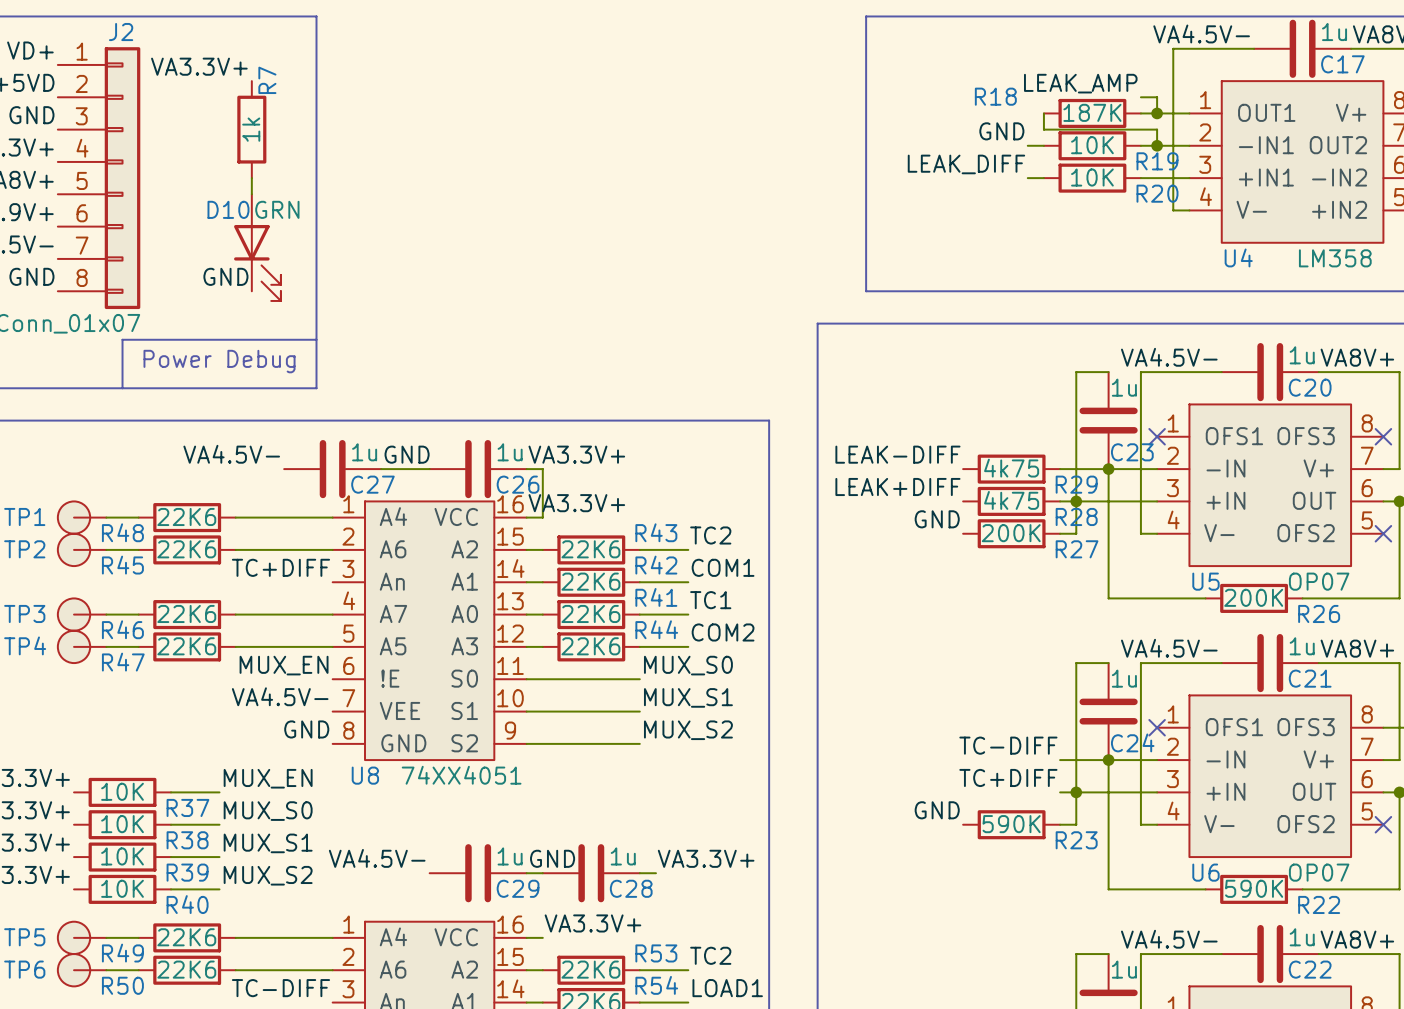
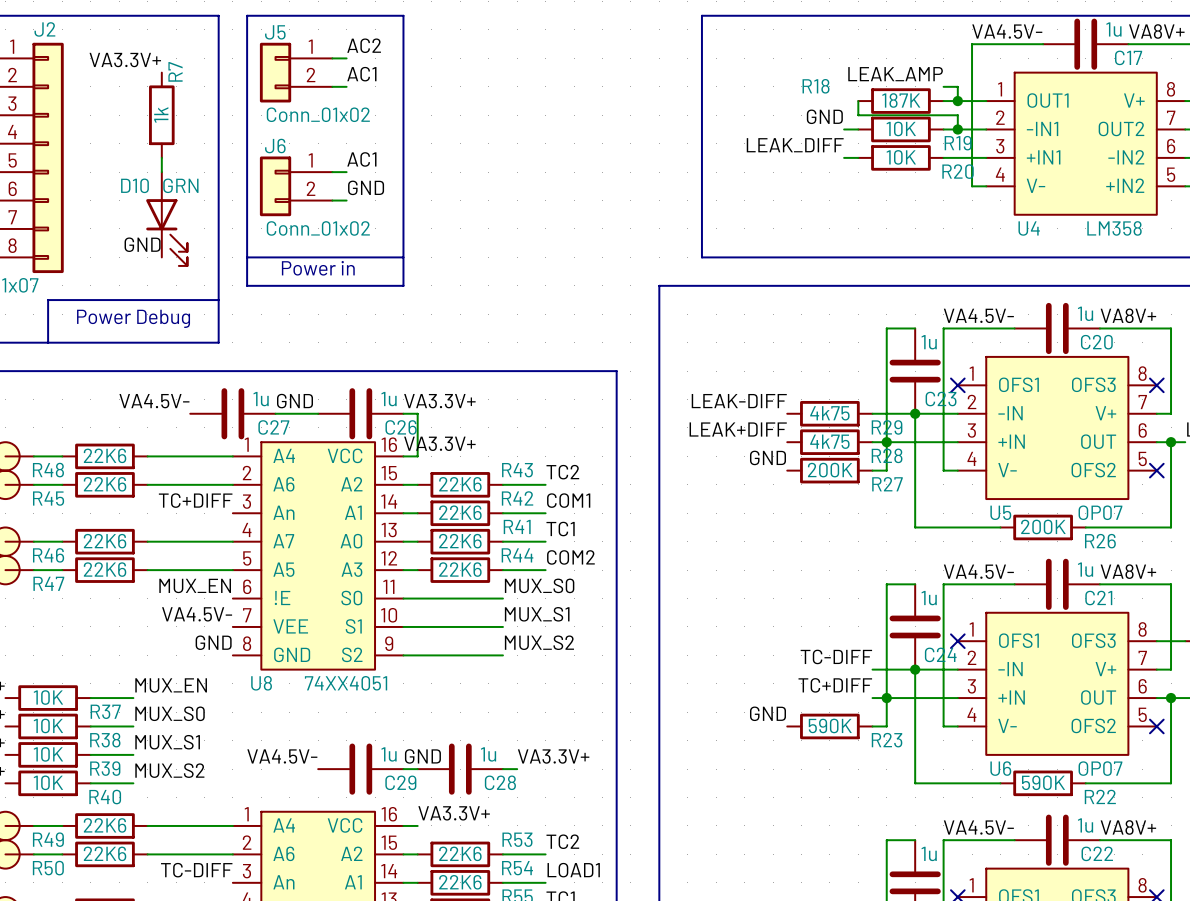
line: none -> (247, 15) (403, 15) (403, 285) (247, 285) (247, 15)
label: none -> AC2 (364, 45)
wire: none -> (332, 58) (346, 58)
J5: none -> Conn_01x02 (296, 72)
label: none -> AC1 (361, 74)
wire: none -> (332, 86) (346, 86)
label: none -> AC1 (361, 159)
wire: none -> (332, 172) (346, 172)
J6: none -> Conn_01x02 (296, 186)
label: none -> GND (366, 187)
wire: none -> (332, 200) (346, 200)
line: none -> (247, 257) (403, 257)
text: none -> Power in (318, 268)

